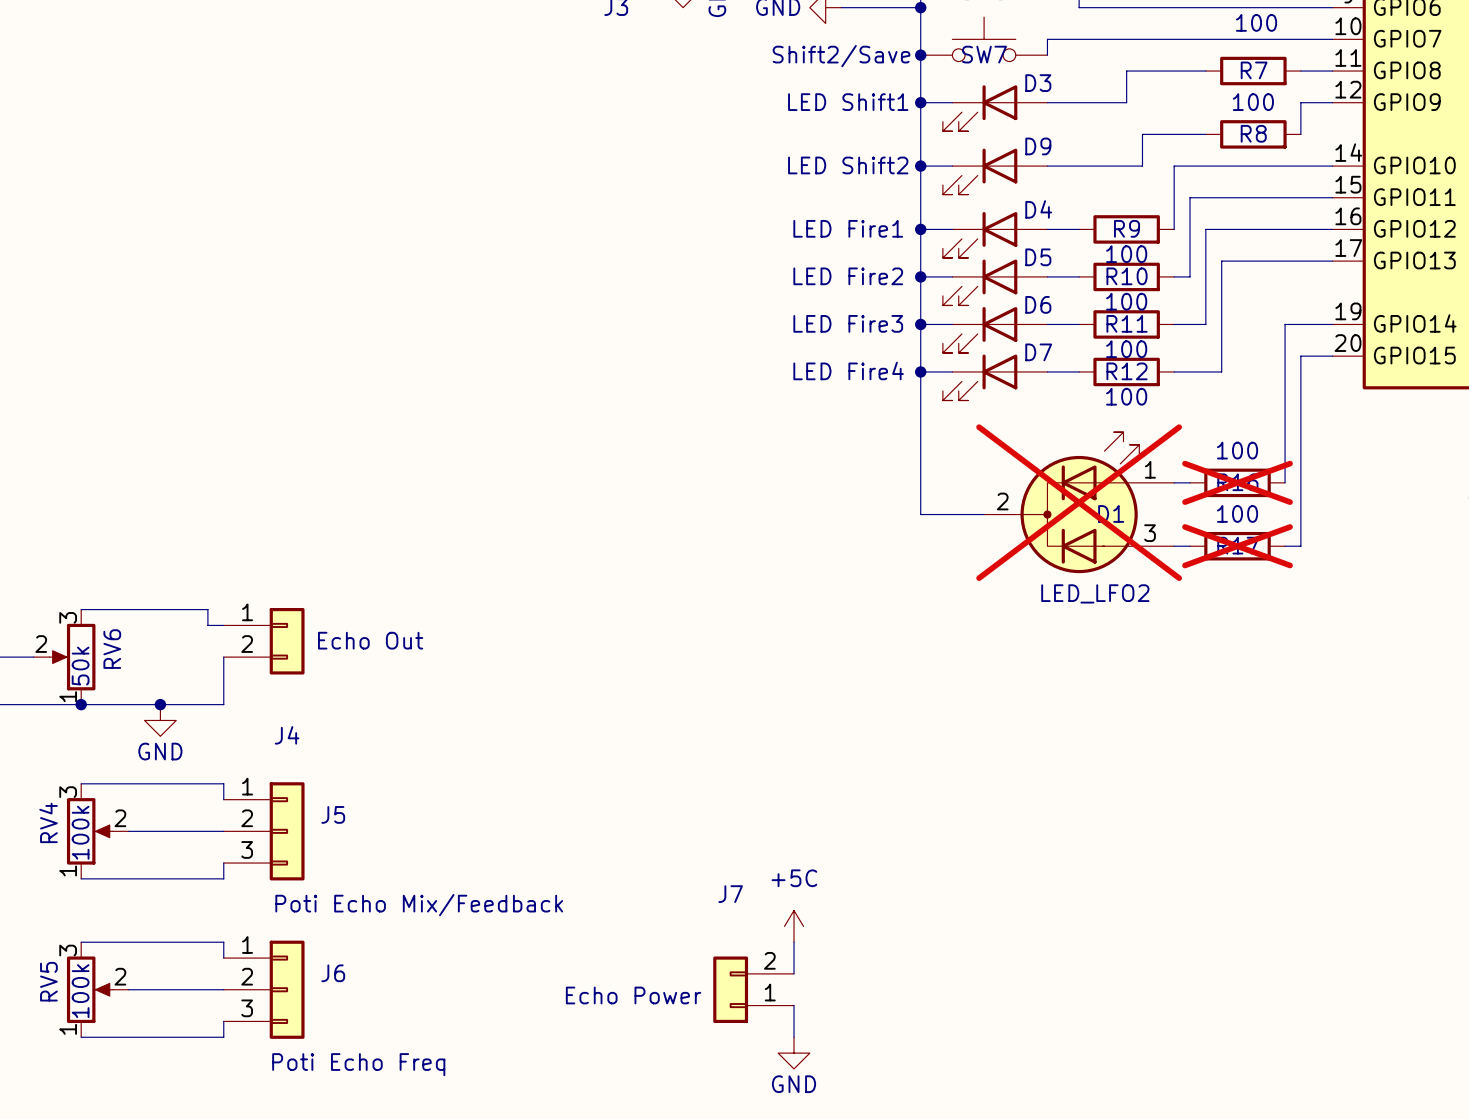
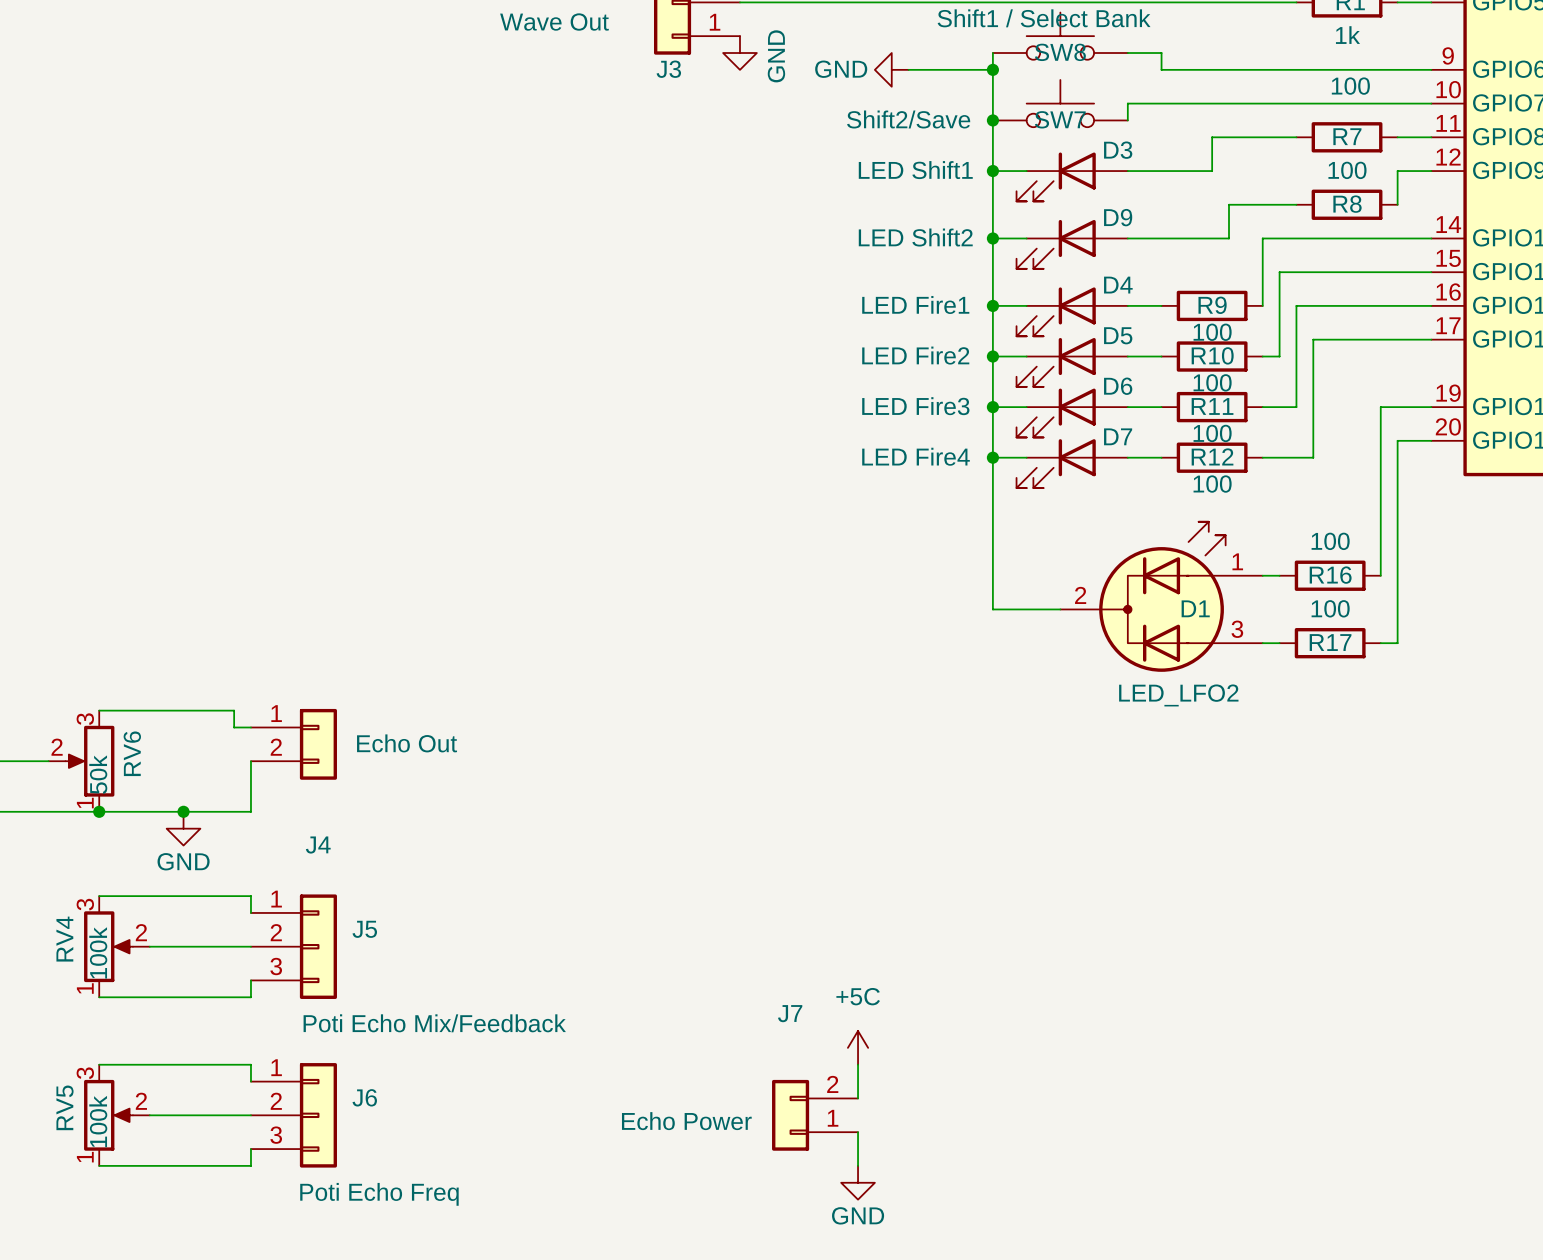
R16 do-not-place cross: (1237, 482) -> none
D1 do-not-place cross: (1079, 502) -> none
R17 do-not-place cross: (1237, 546) -> none

